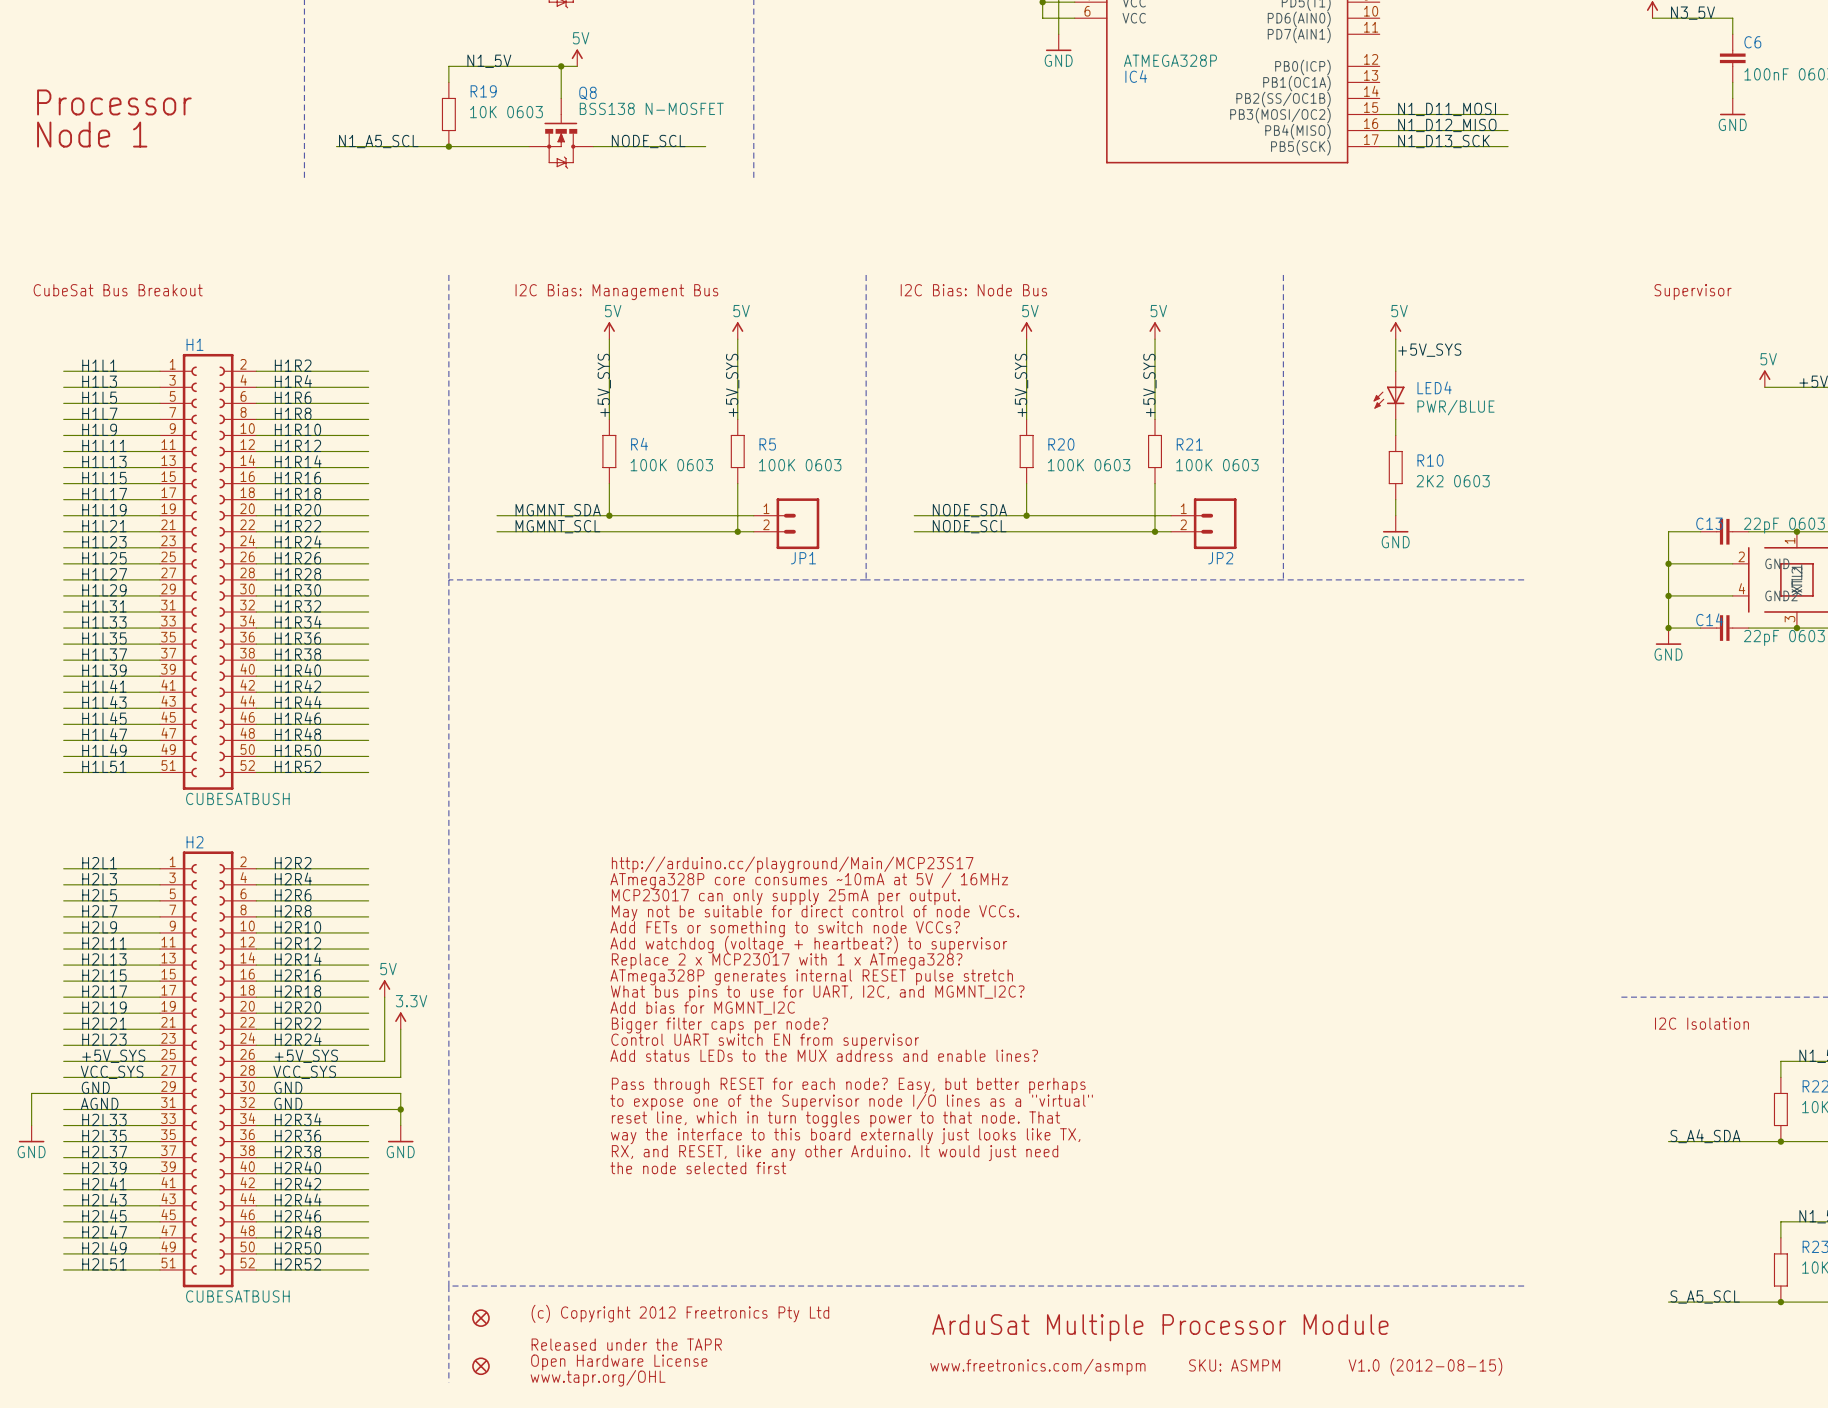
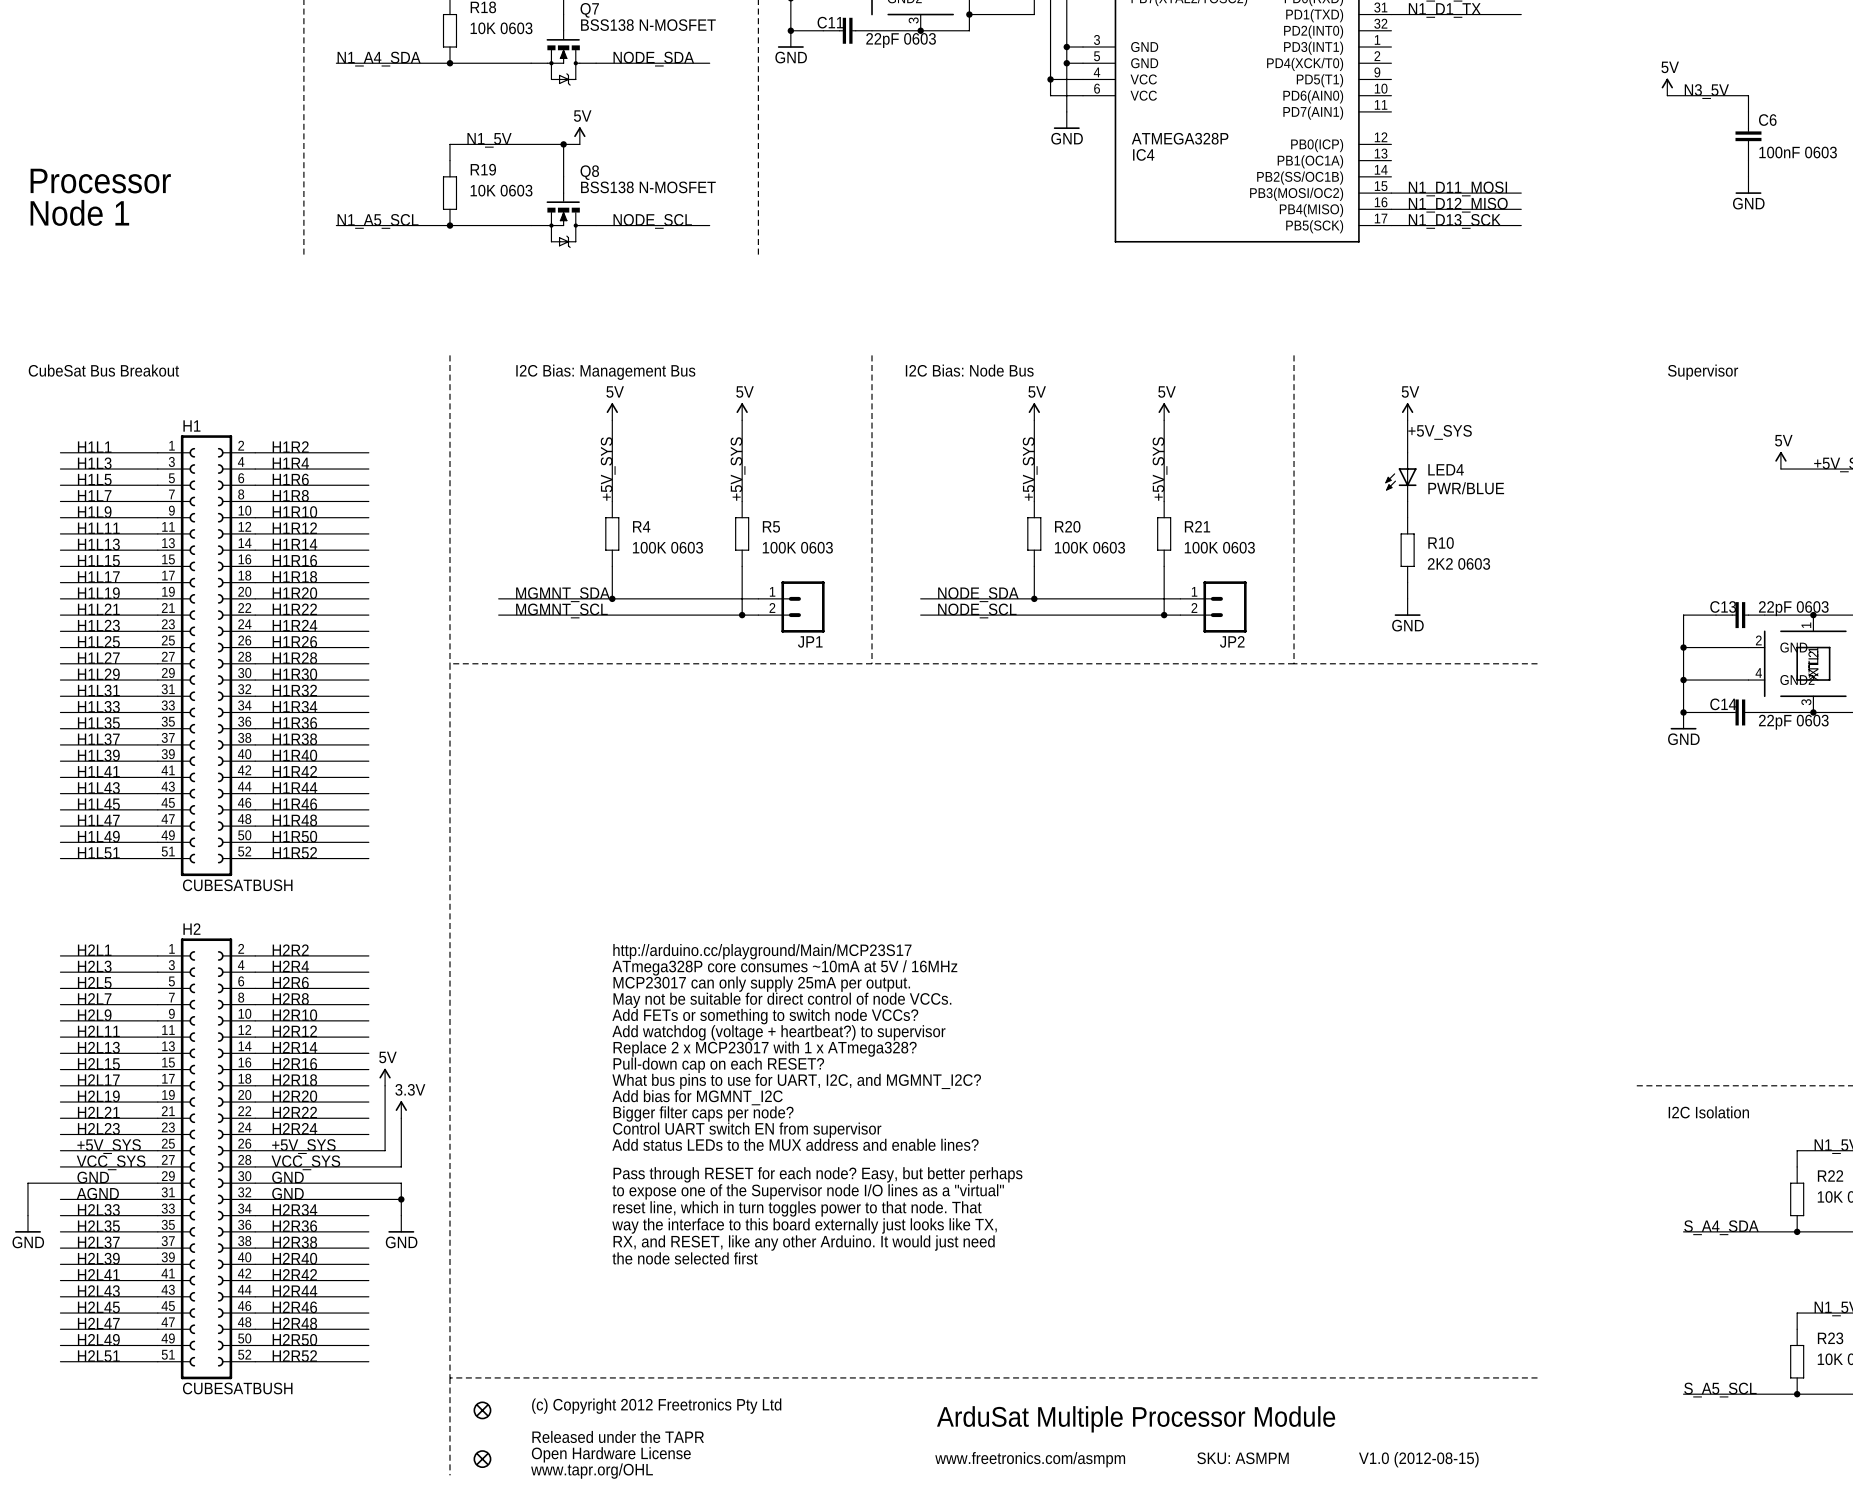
text: ATmega328P generates internal RESET pulse stretch (811, 977) -> Pull-down cap on each RESET? (718, 1065)

